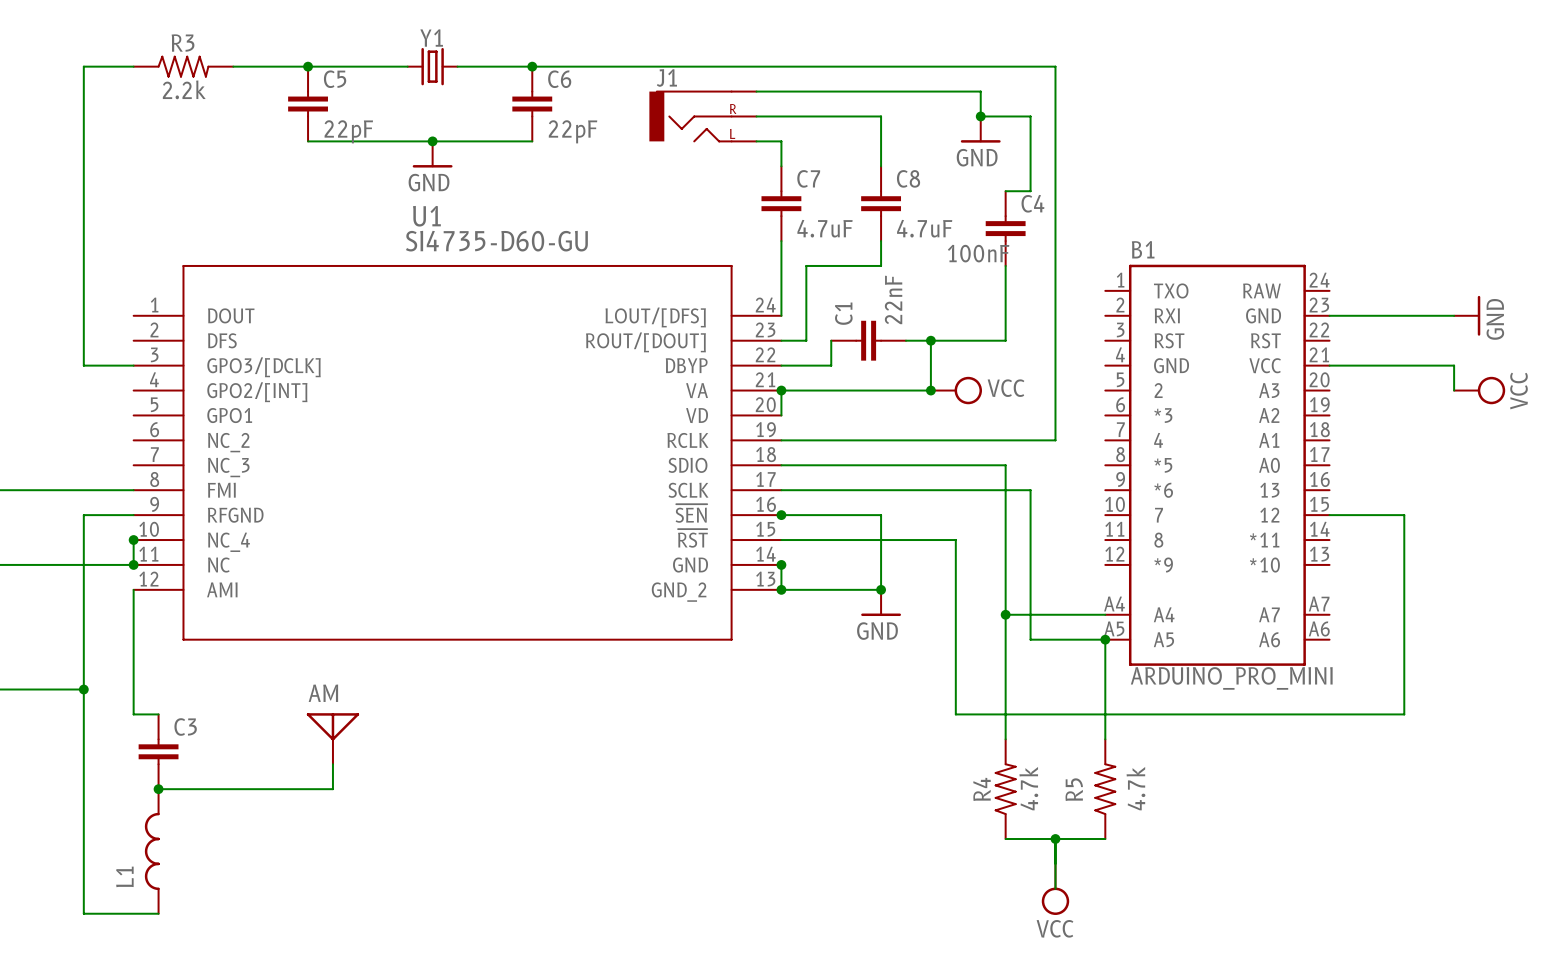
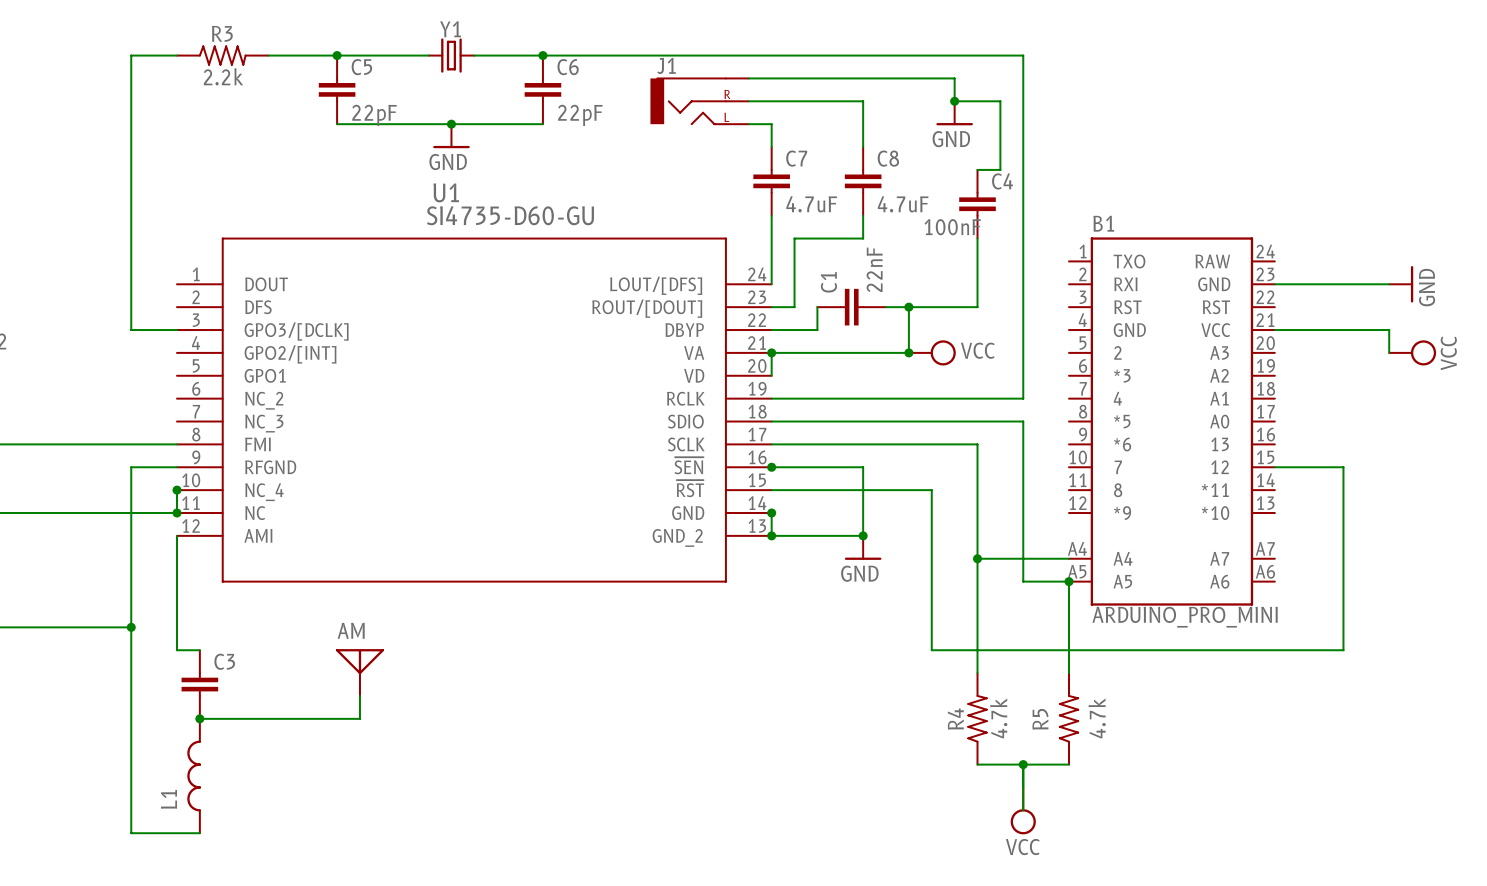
wire: (1005, 465) (1005, 490) (1030, 490) (1030, 639) (1055, 639) -> (977, 421) (1023, 421) (1023, 581)

